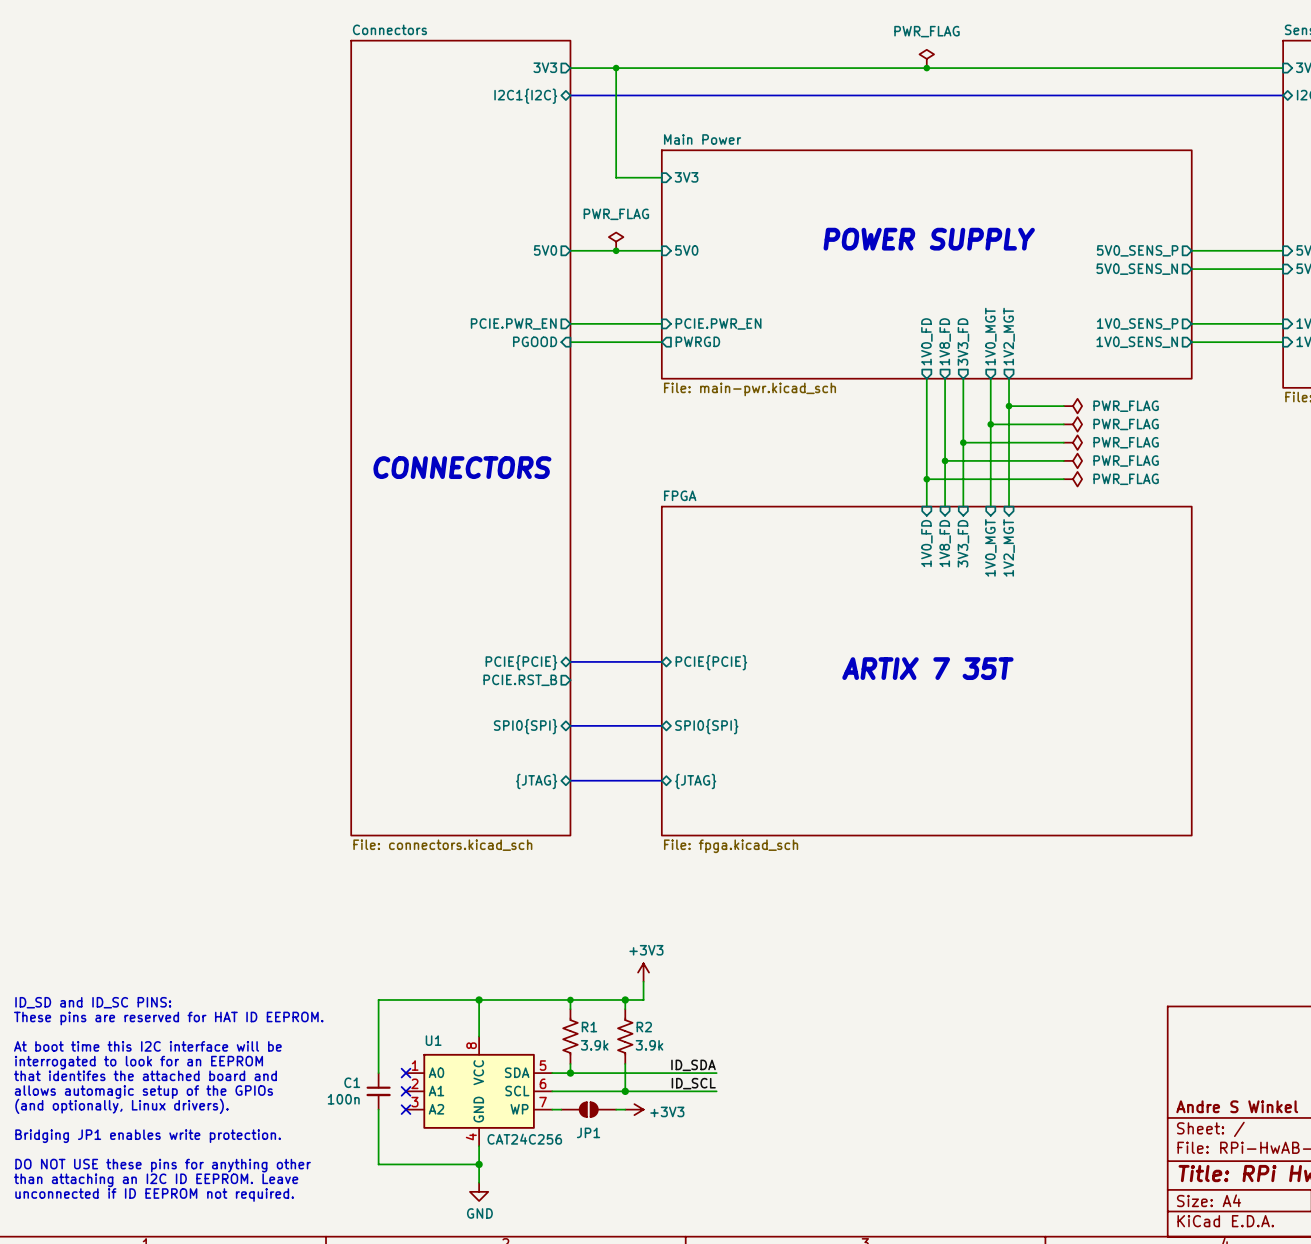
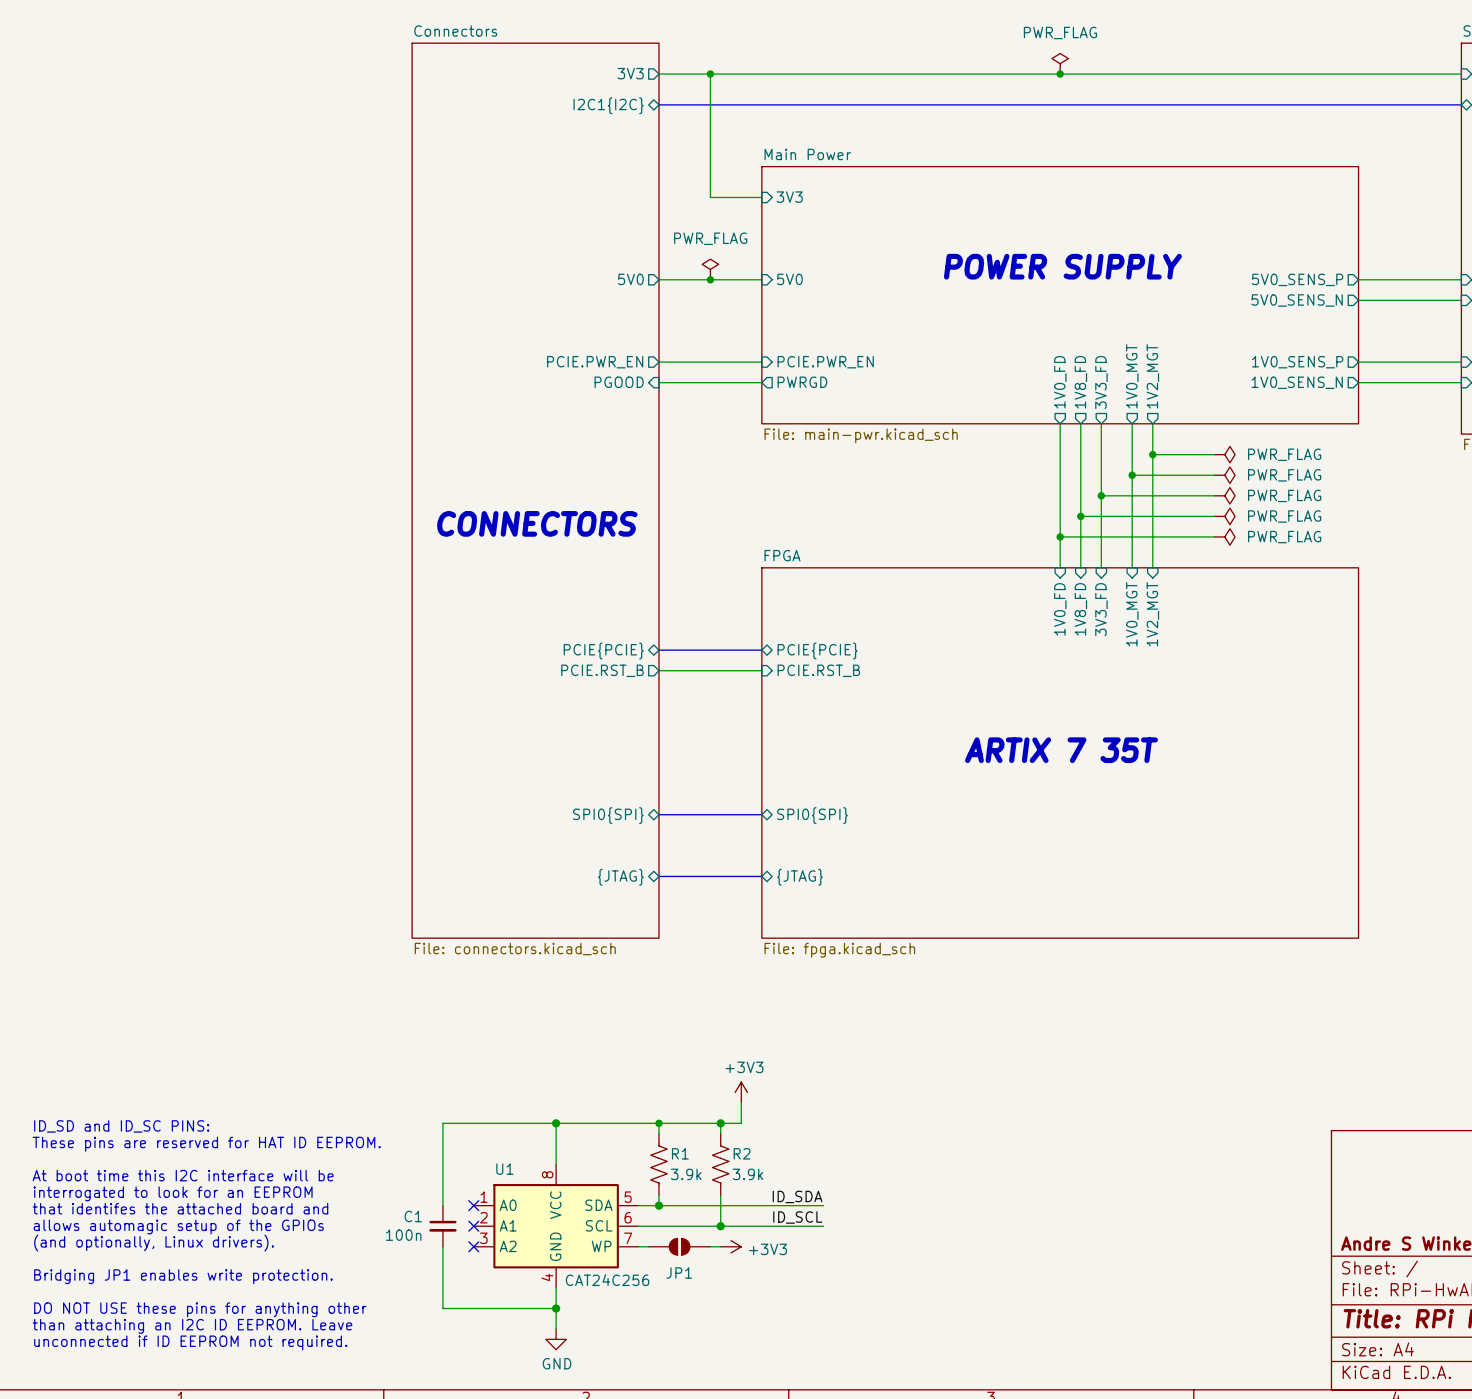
sheet pin: none -> PCIE{PCIE} (603, 650)
sheet pin: none -> PCIE{PCIE} (817, 650)
wire: none -> (658, 670) (761, 670)
sheet pin: none -> PCIE.RST_B (602, 670)
sheet pin: none -> PCIE.RST_B (818, 670)
bus: (570, 661) (661, 661) -> (658, 650) (761, 650)
sheet pin: PCIE{PCIE} (521, 662) -> none
sheet pin: PCIE{PCIE} (711, 662) -> none
sheet pin: PCIE.RST_B (520, 680) -> none

